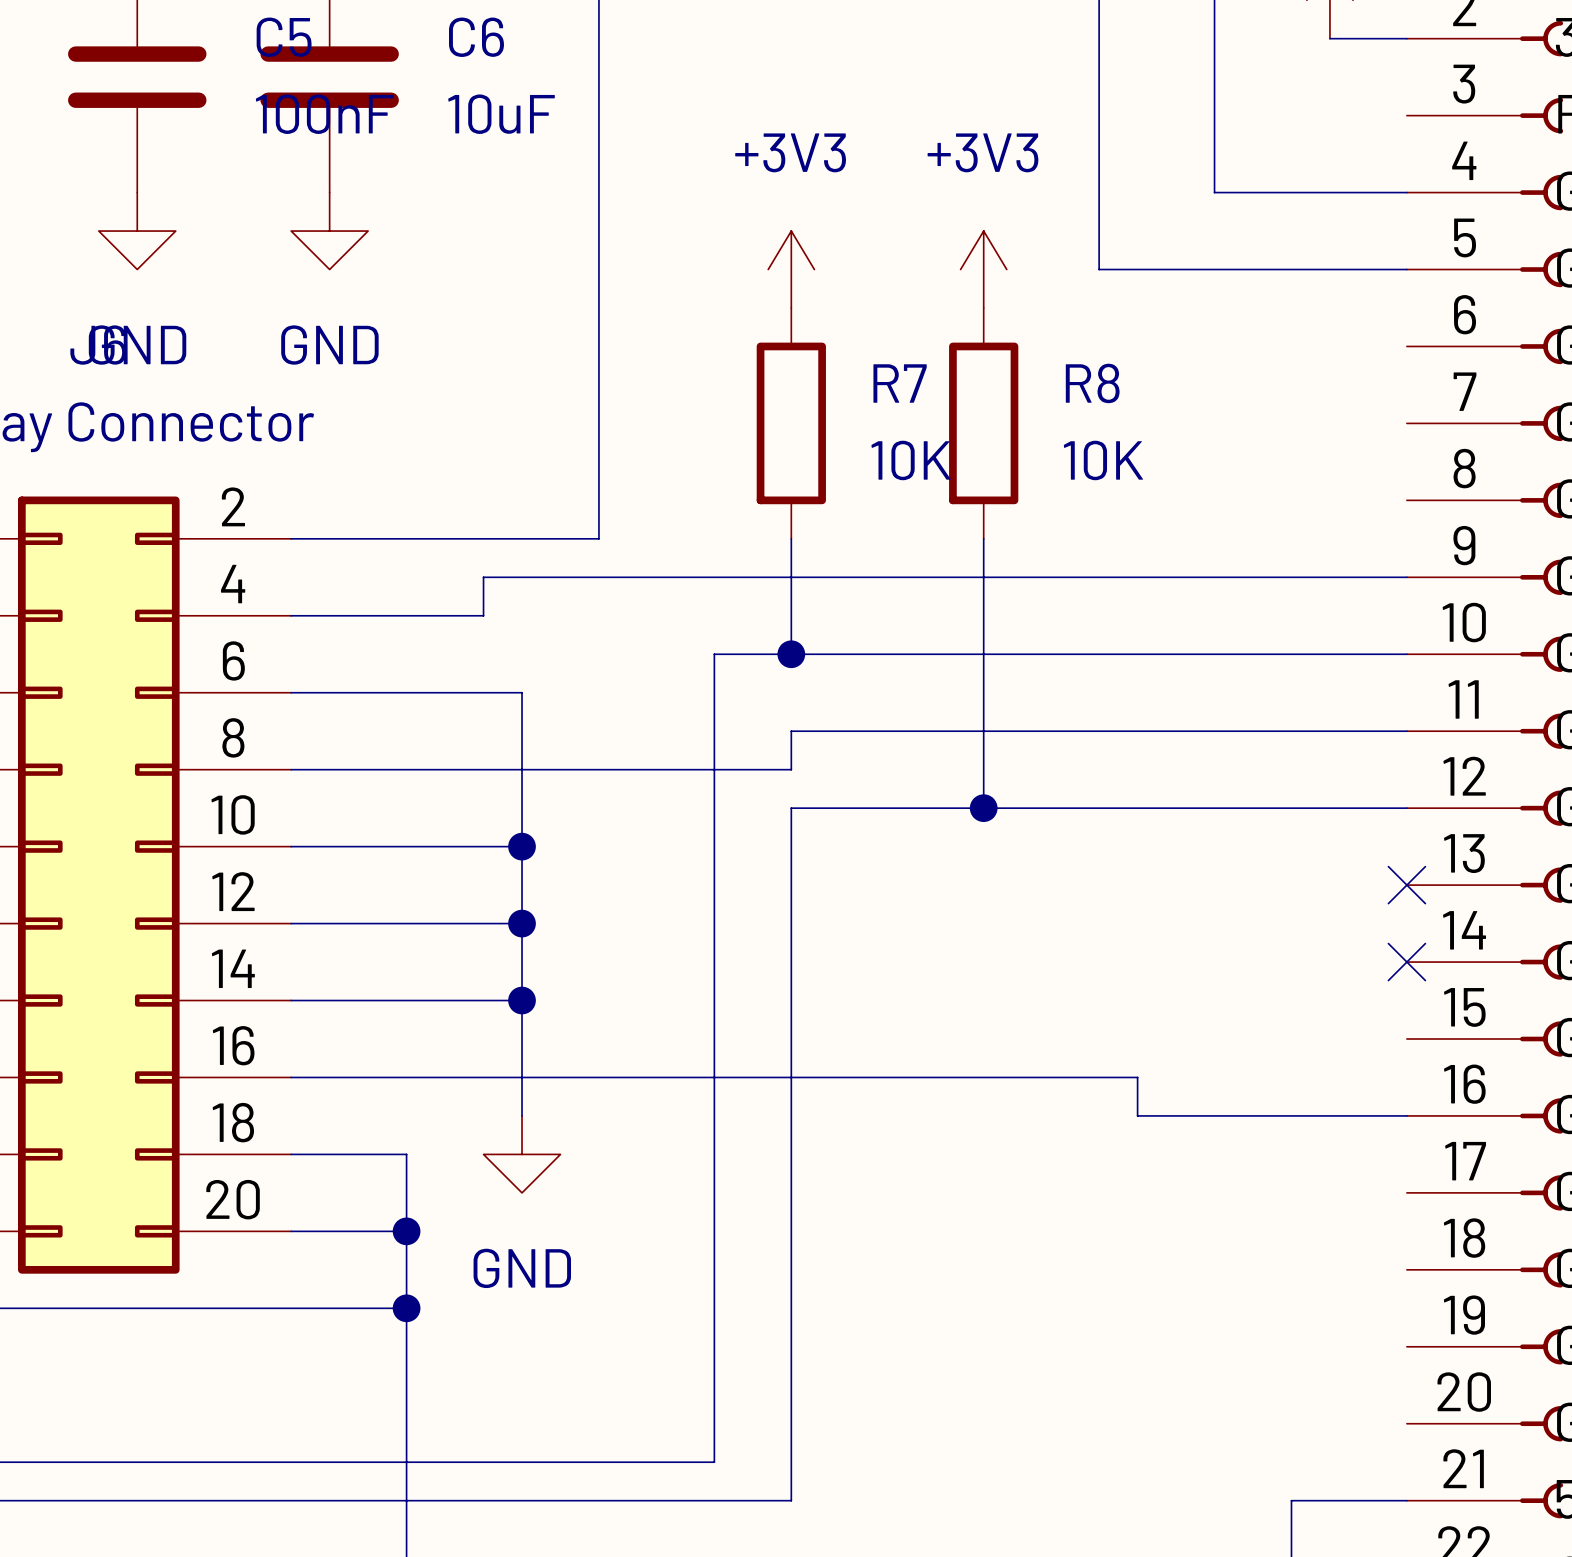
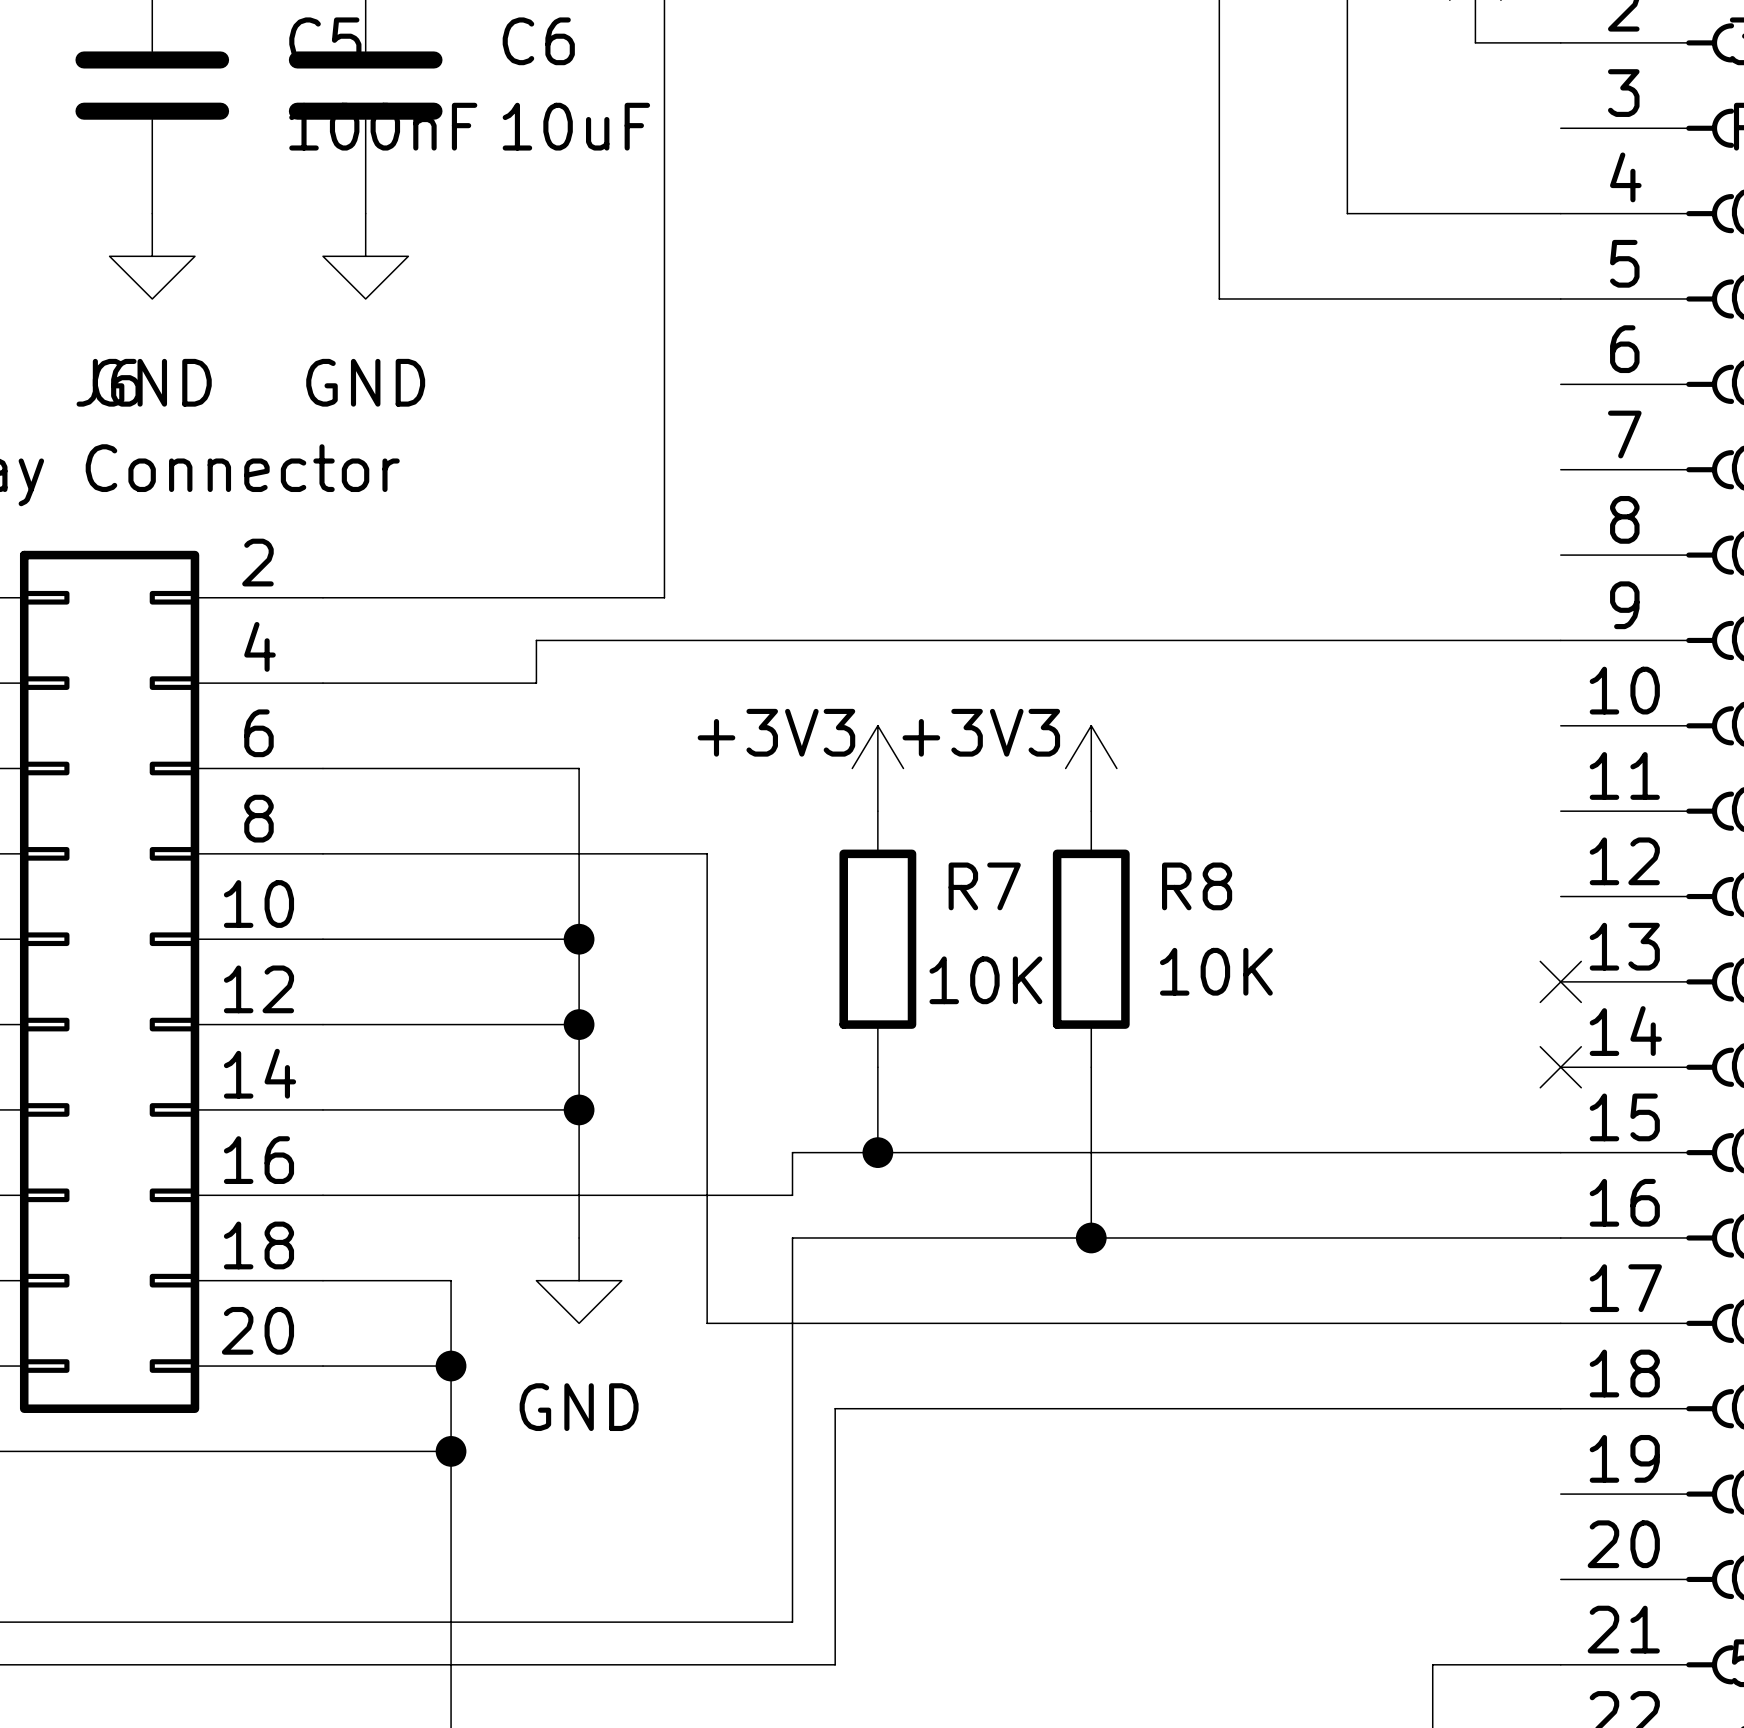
power symbol: +3V3 (791, 269) -> none
power symbol: +3V3 (983, 269) -> none
R7 name position: R7 (900, 383) -> R7 (984, 886)
R8 name position: R8 (1092, 383) -> R8 (1197, 886)
R7 position: (791, 423) -> (877, 939)
R8 position: (983, 423) -> (1091, 939)
R7 value position: 10K (911, 460) -> 10K (985, 980)
R8 value position: 10K (1103, 460) -> 10K (1216, 971)
wire: (791, 538) (791, 654) -> none
wire: (983, 538) (983, 808) -> none
junction: (791, 654) -> none
wire: (1406, 654) (714, 654) (714, 1038) -> (1560, 1152) (792, 1152)
power symbol: none -> +3V3 (877, 768)
power symbol: none -> +3V3 (1091, 768)
wire: (1406, 731) (791, 731) (791, 769) (637, 769) -> (1560, 1323) (707, 1323) (707, 853)
junction: (983, 808) -> none
wire: (1406, 808) (791, 808) (791, 962) -> none
wire: none -> (1091, 1067) (1091, 1237)
wire: (791, 1038) (791, 1500) (752, 1500) -> (1560, 1408) (835, 1408) (835, 1664)
junction: none -> (877, 1152)
wire: (714, 1115) (714, 1077) (1137, 1077) (1137, 1115) -> (792, 1237) (1262, 1237)
junction: none -> (1091, 1237)

